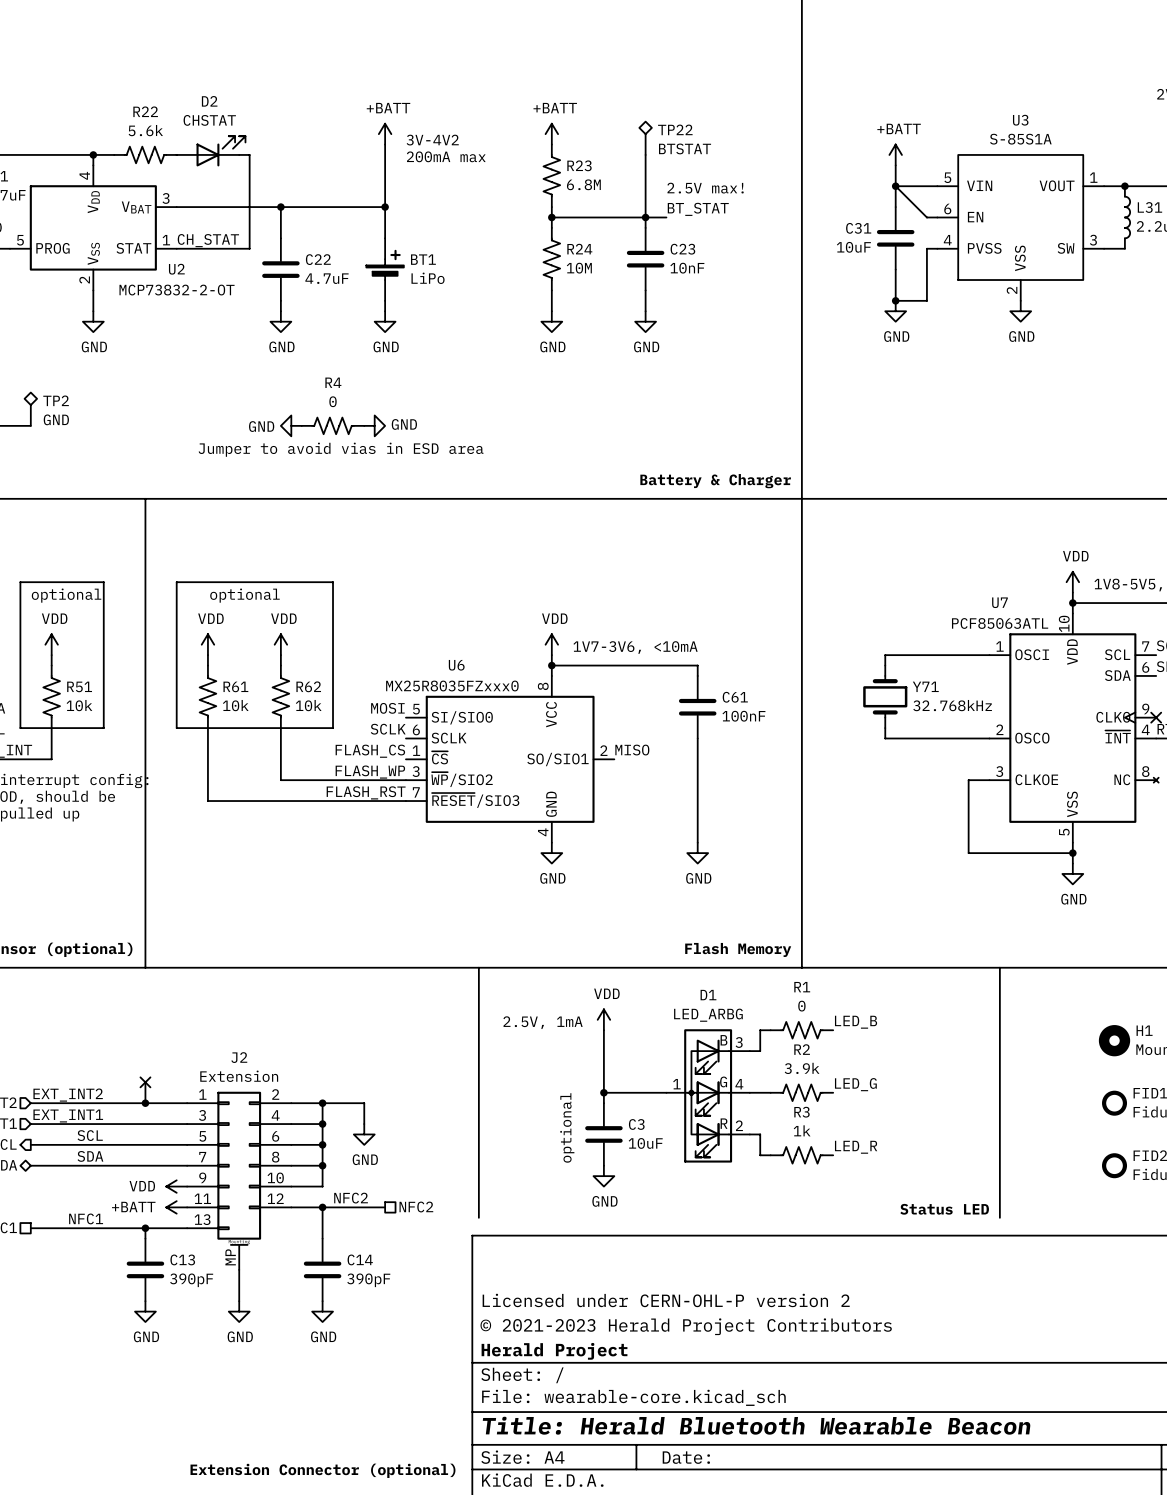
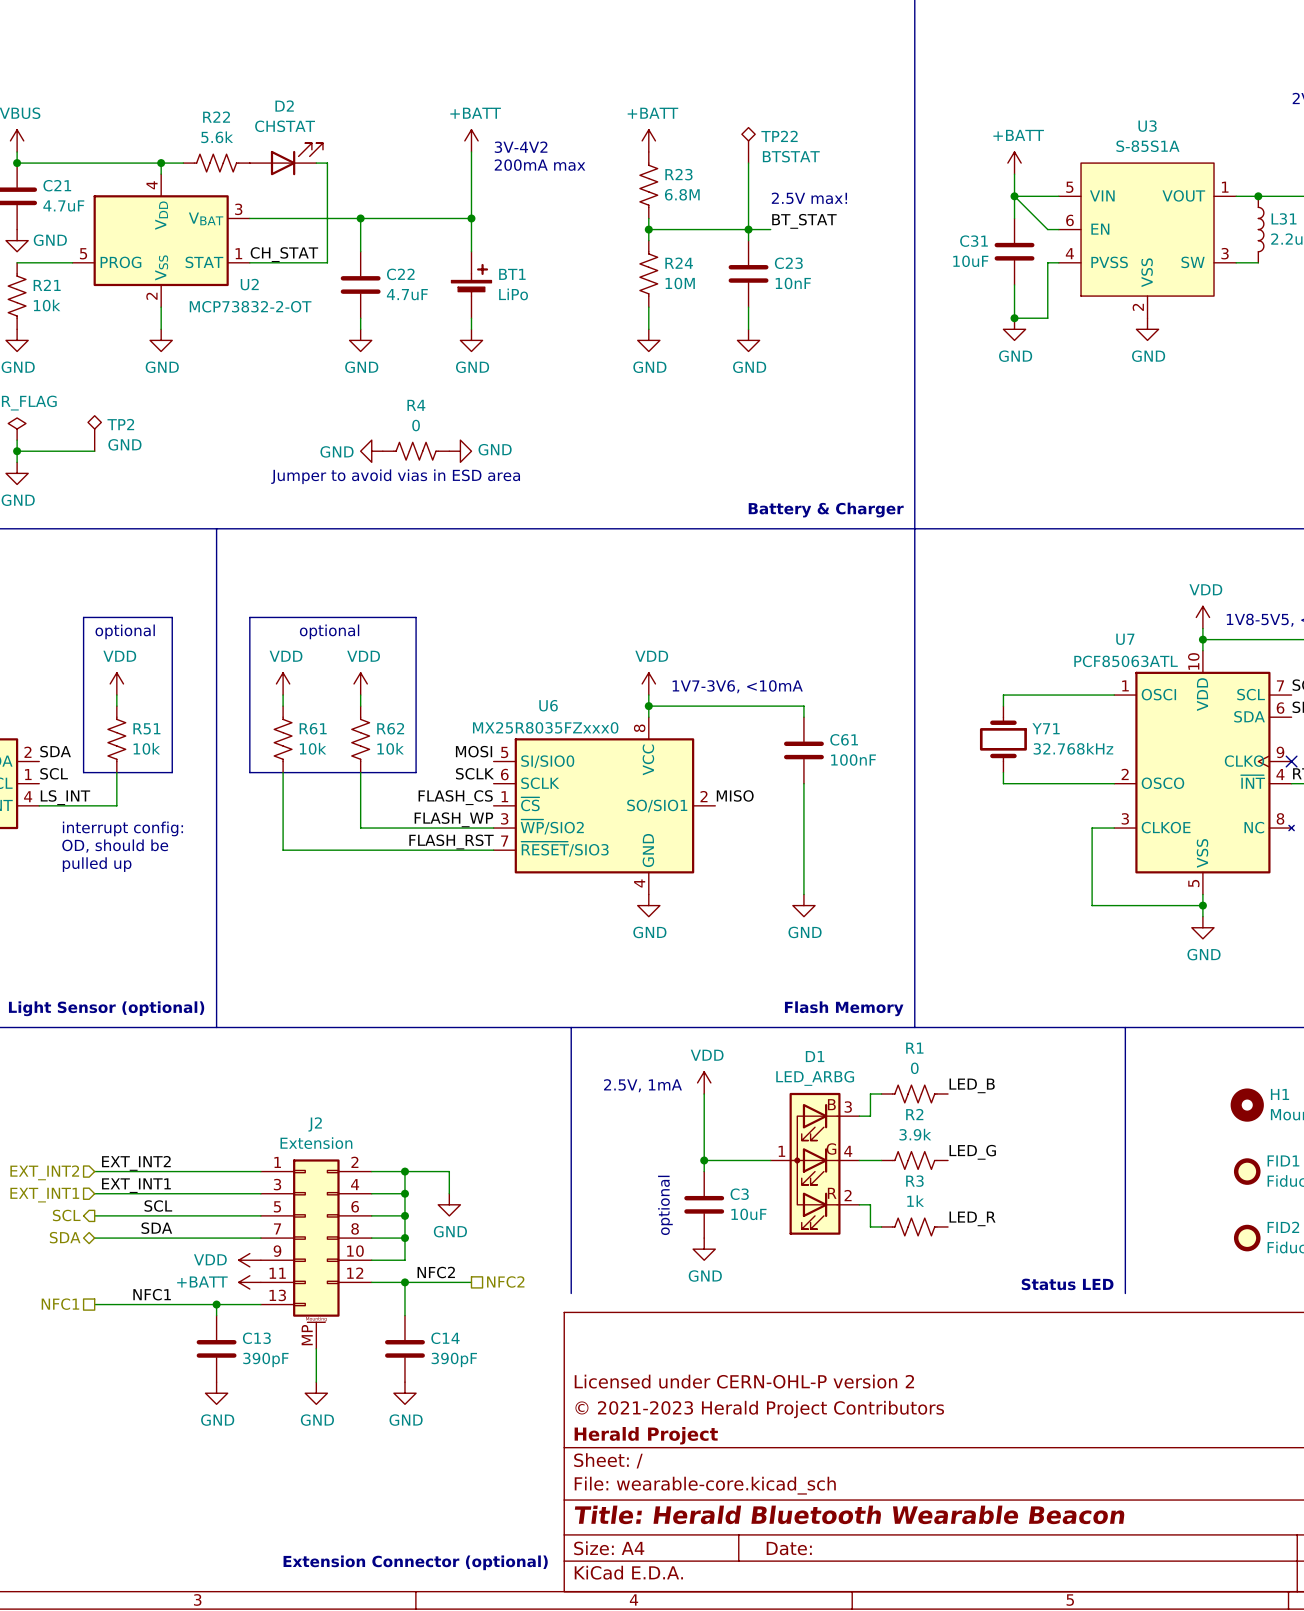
wire: (145, 1082) (145, 1103) -> none
no-connect mark: (145, 1082) -> none
junction: (145, 1103) -> none

